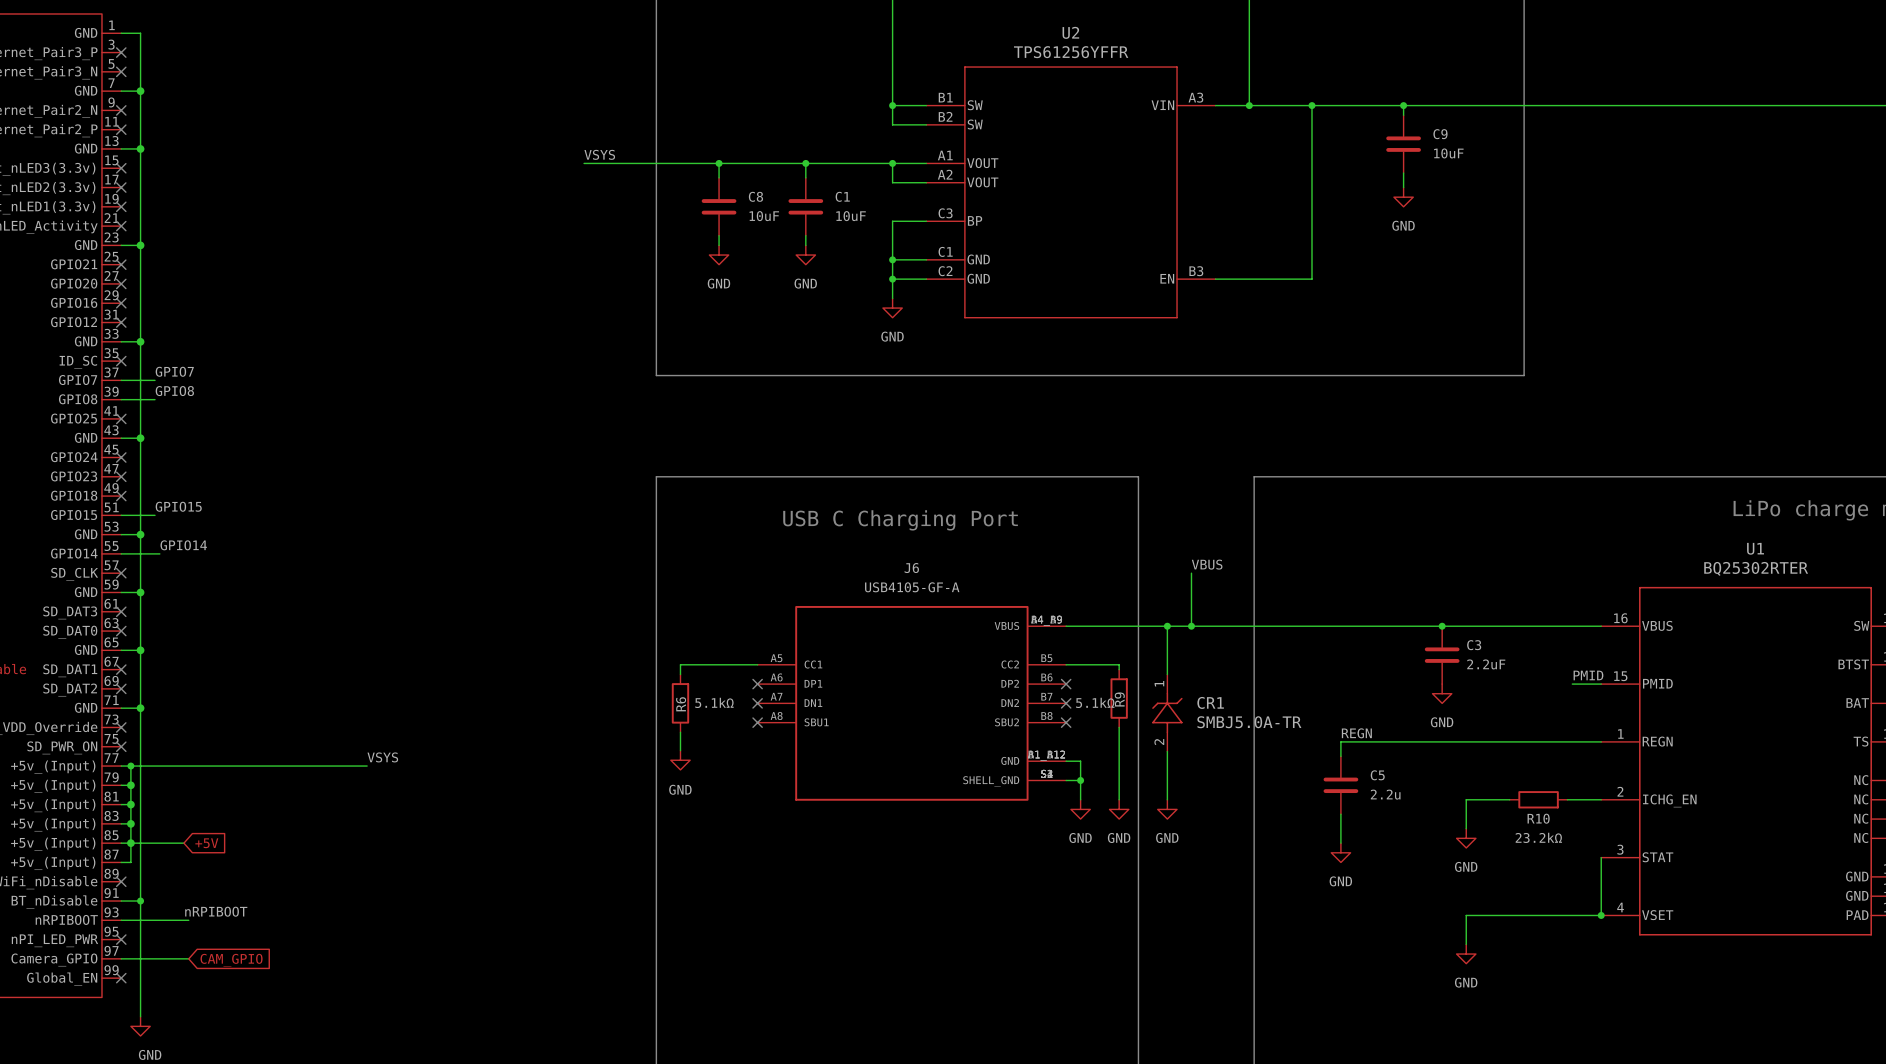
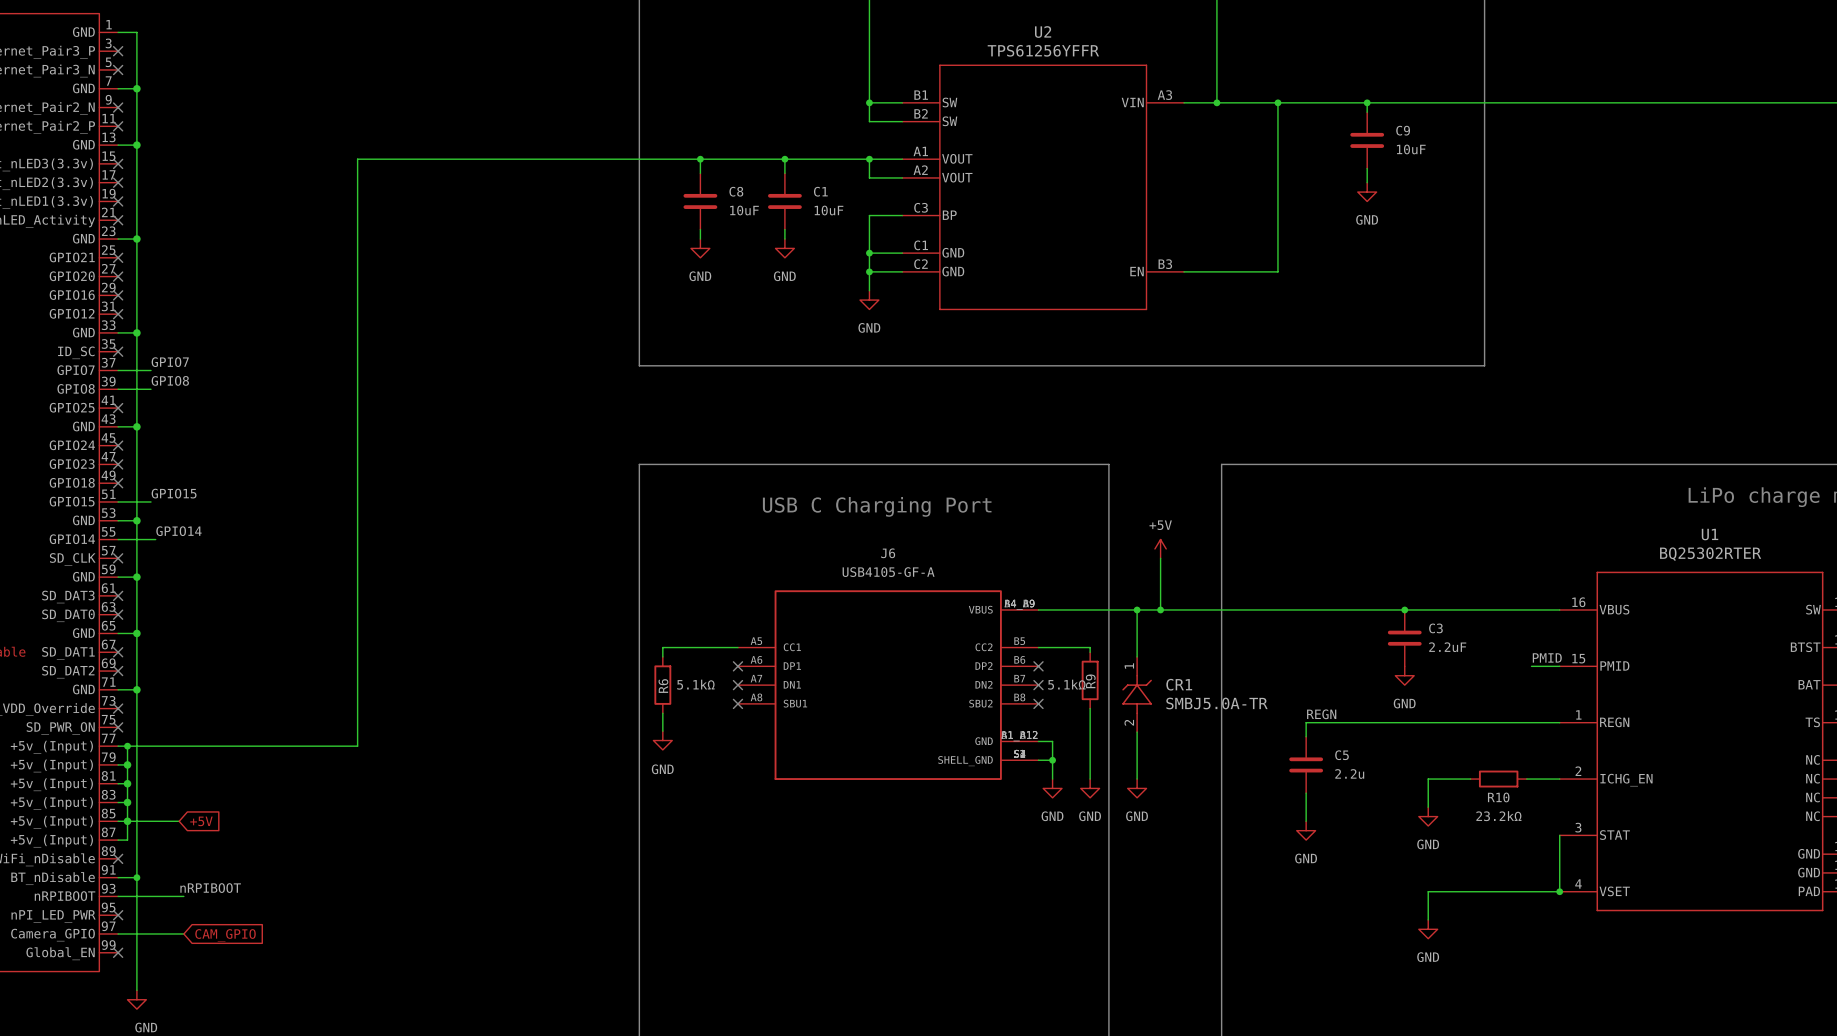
label: VSYS (599, 154) -> none
wire: none -> (568, 159) (357, 159) (357, 746)
power symbol: none -> +5V (1160, 548)
label: VBUS (1207, 564) -> none
label: VSYS (382, 757) -> none

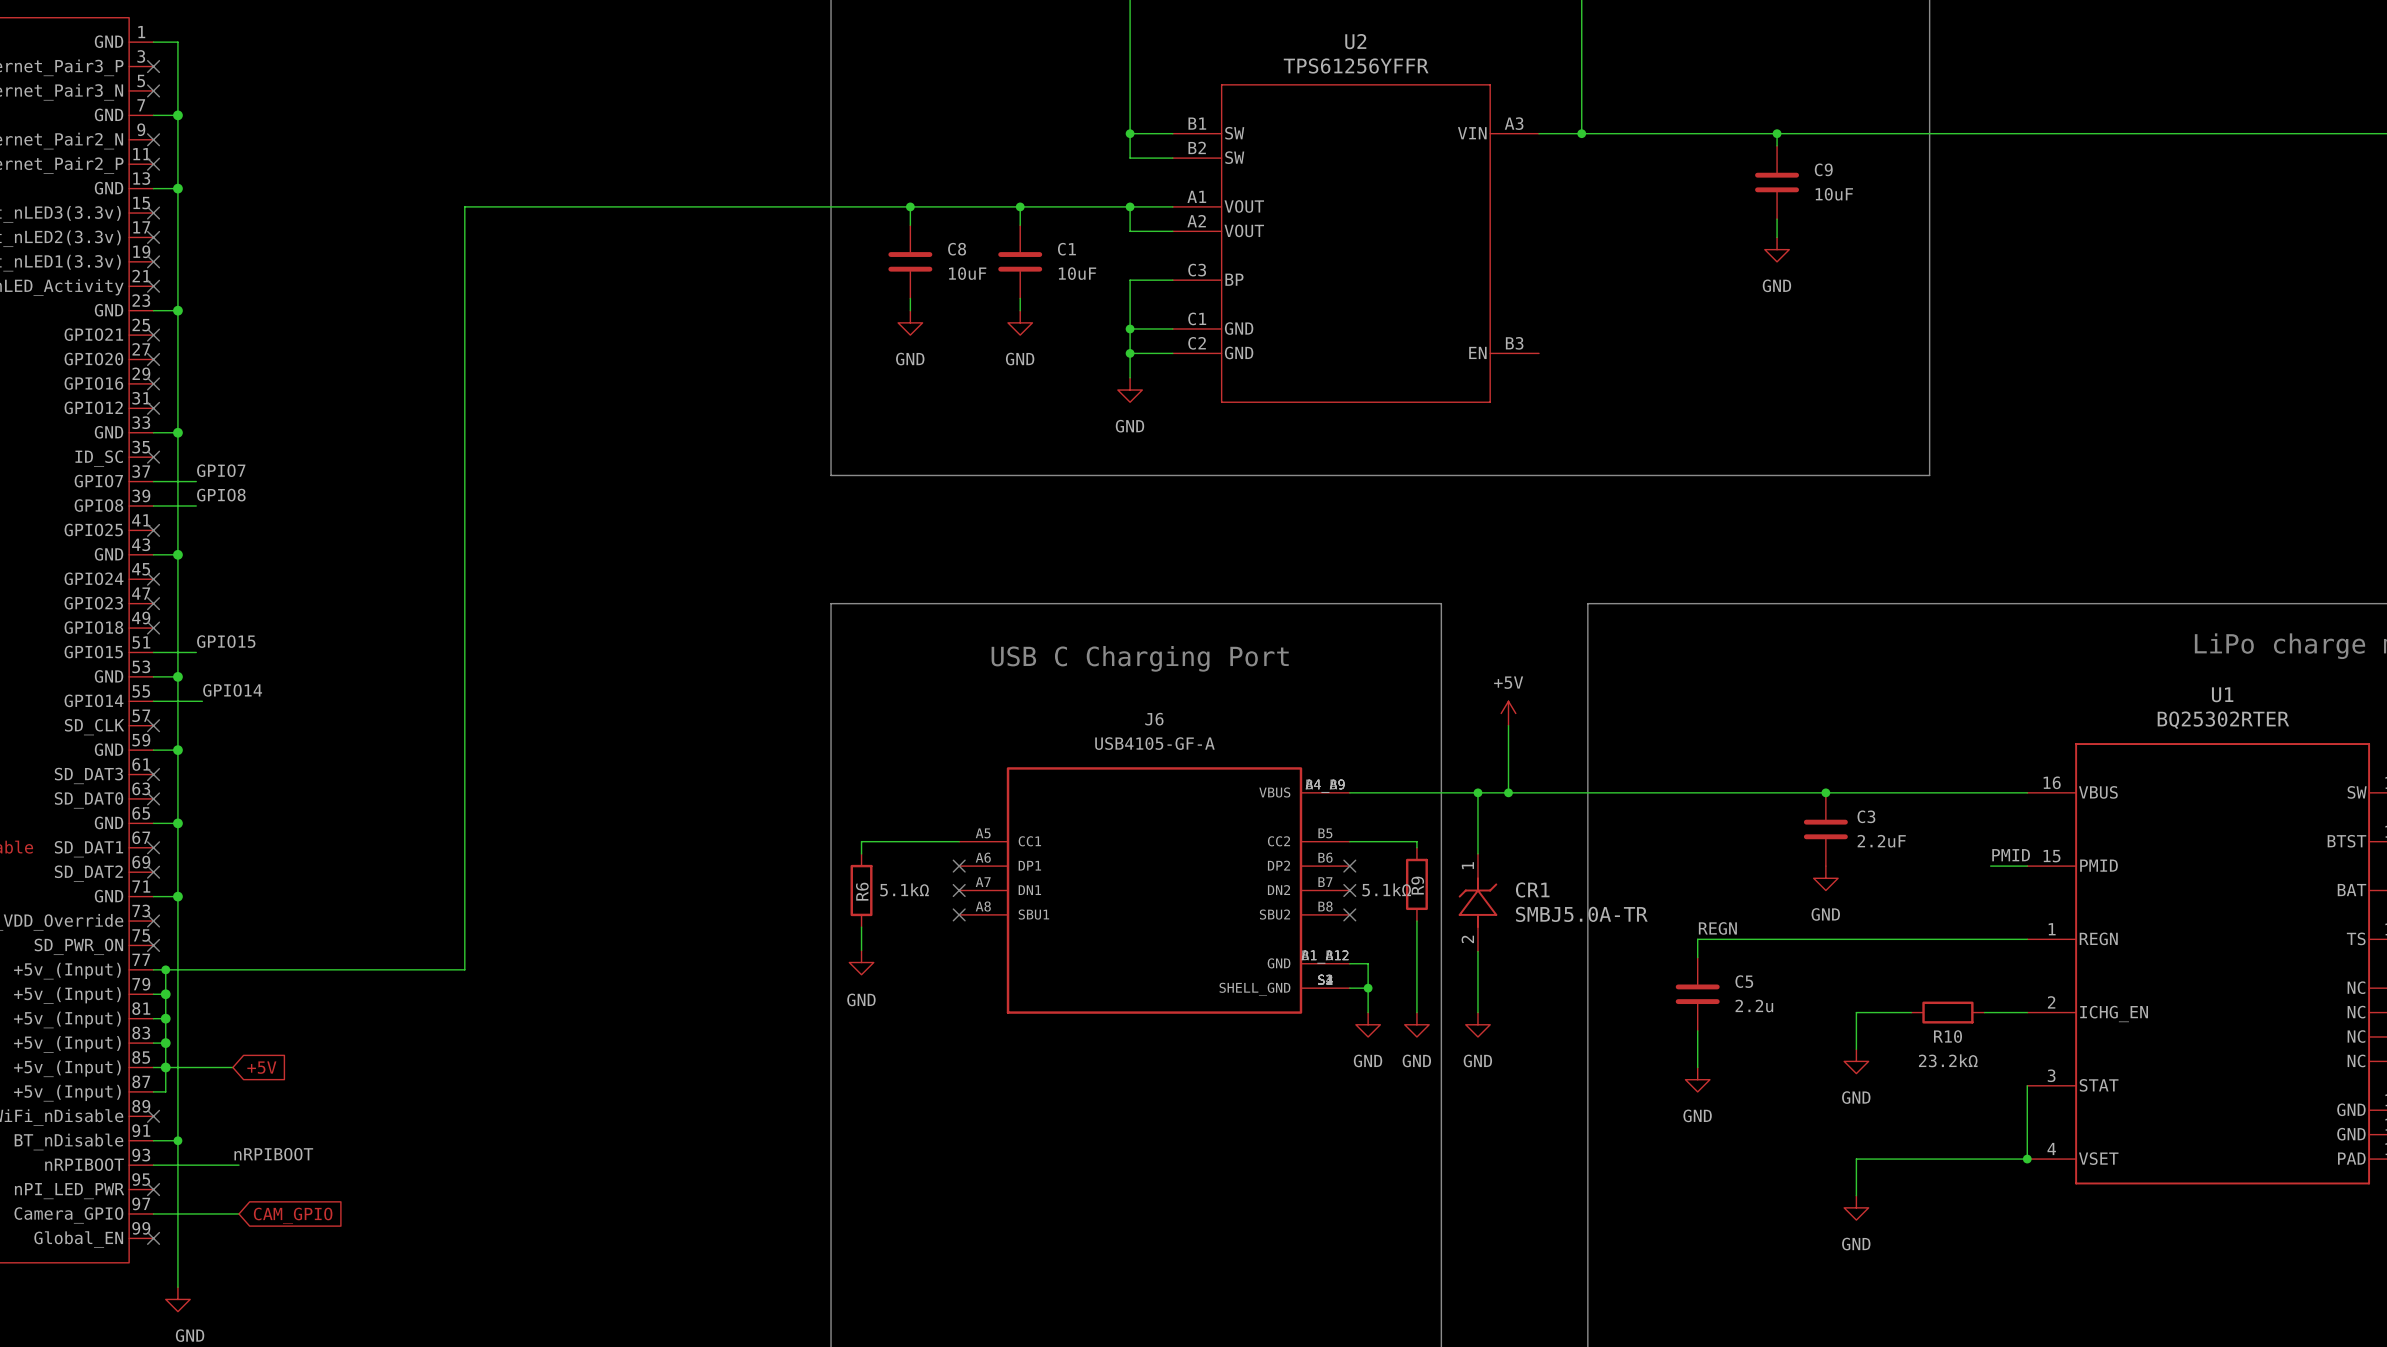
wire: (1277, 102) (1277, 271) (1184, 271) -> none
junction: (1277, 102) -> none

